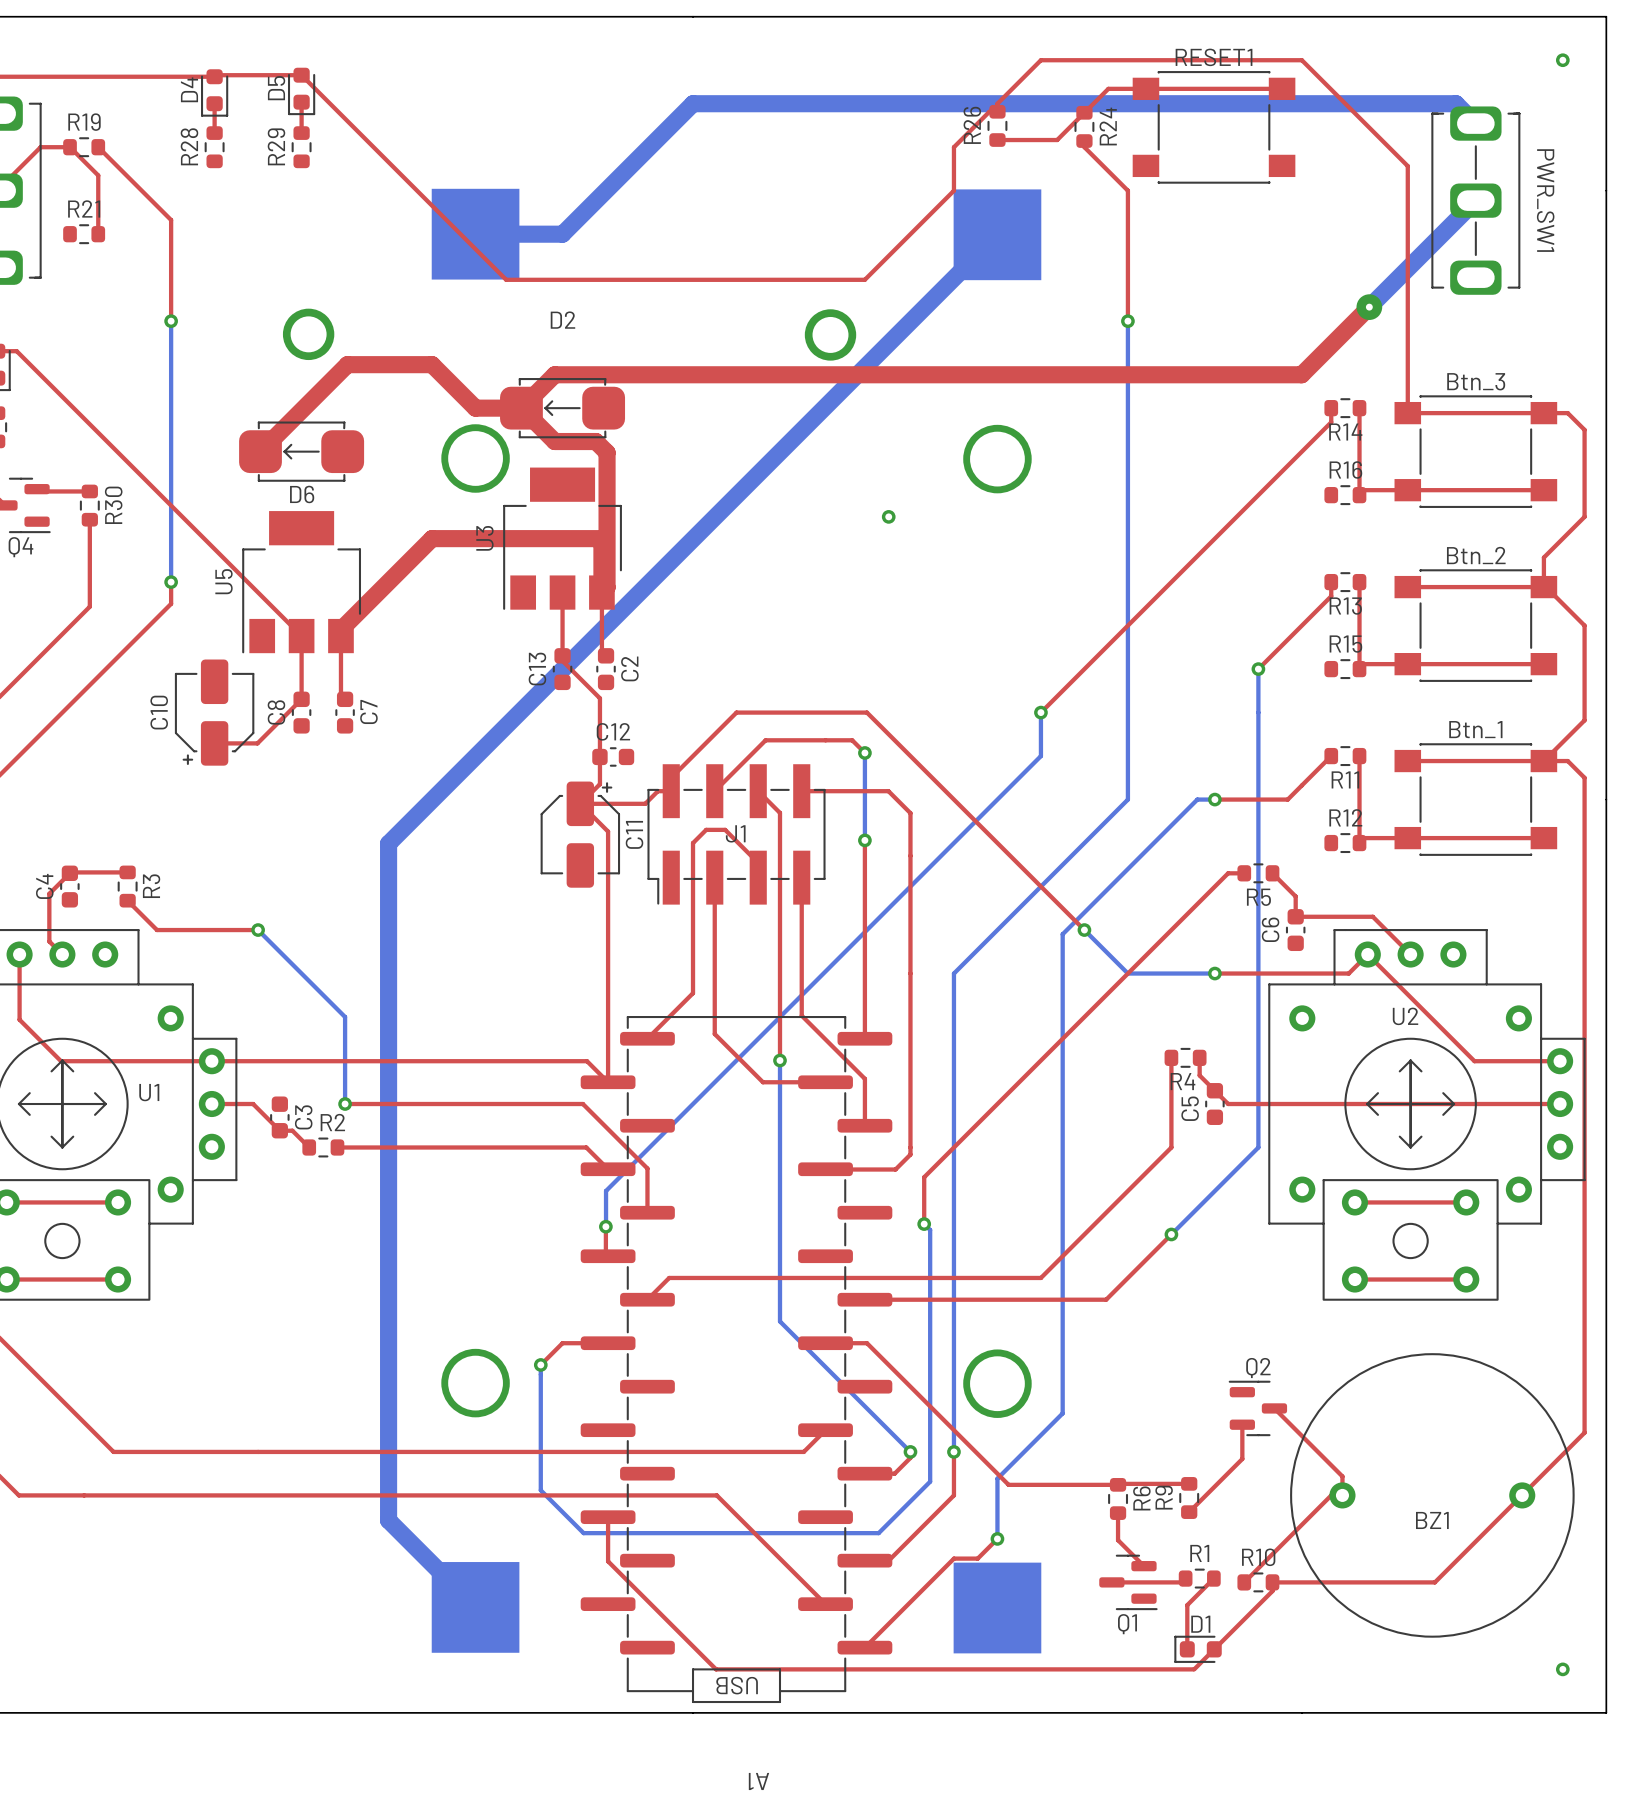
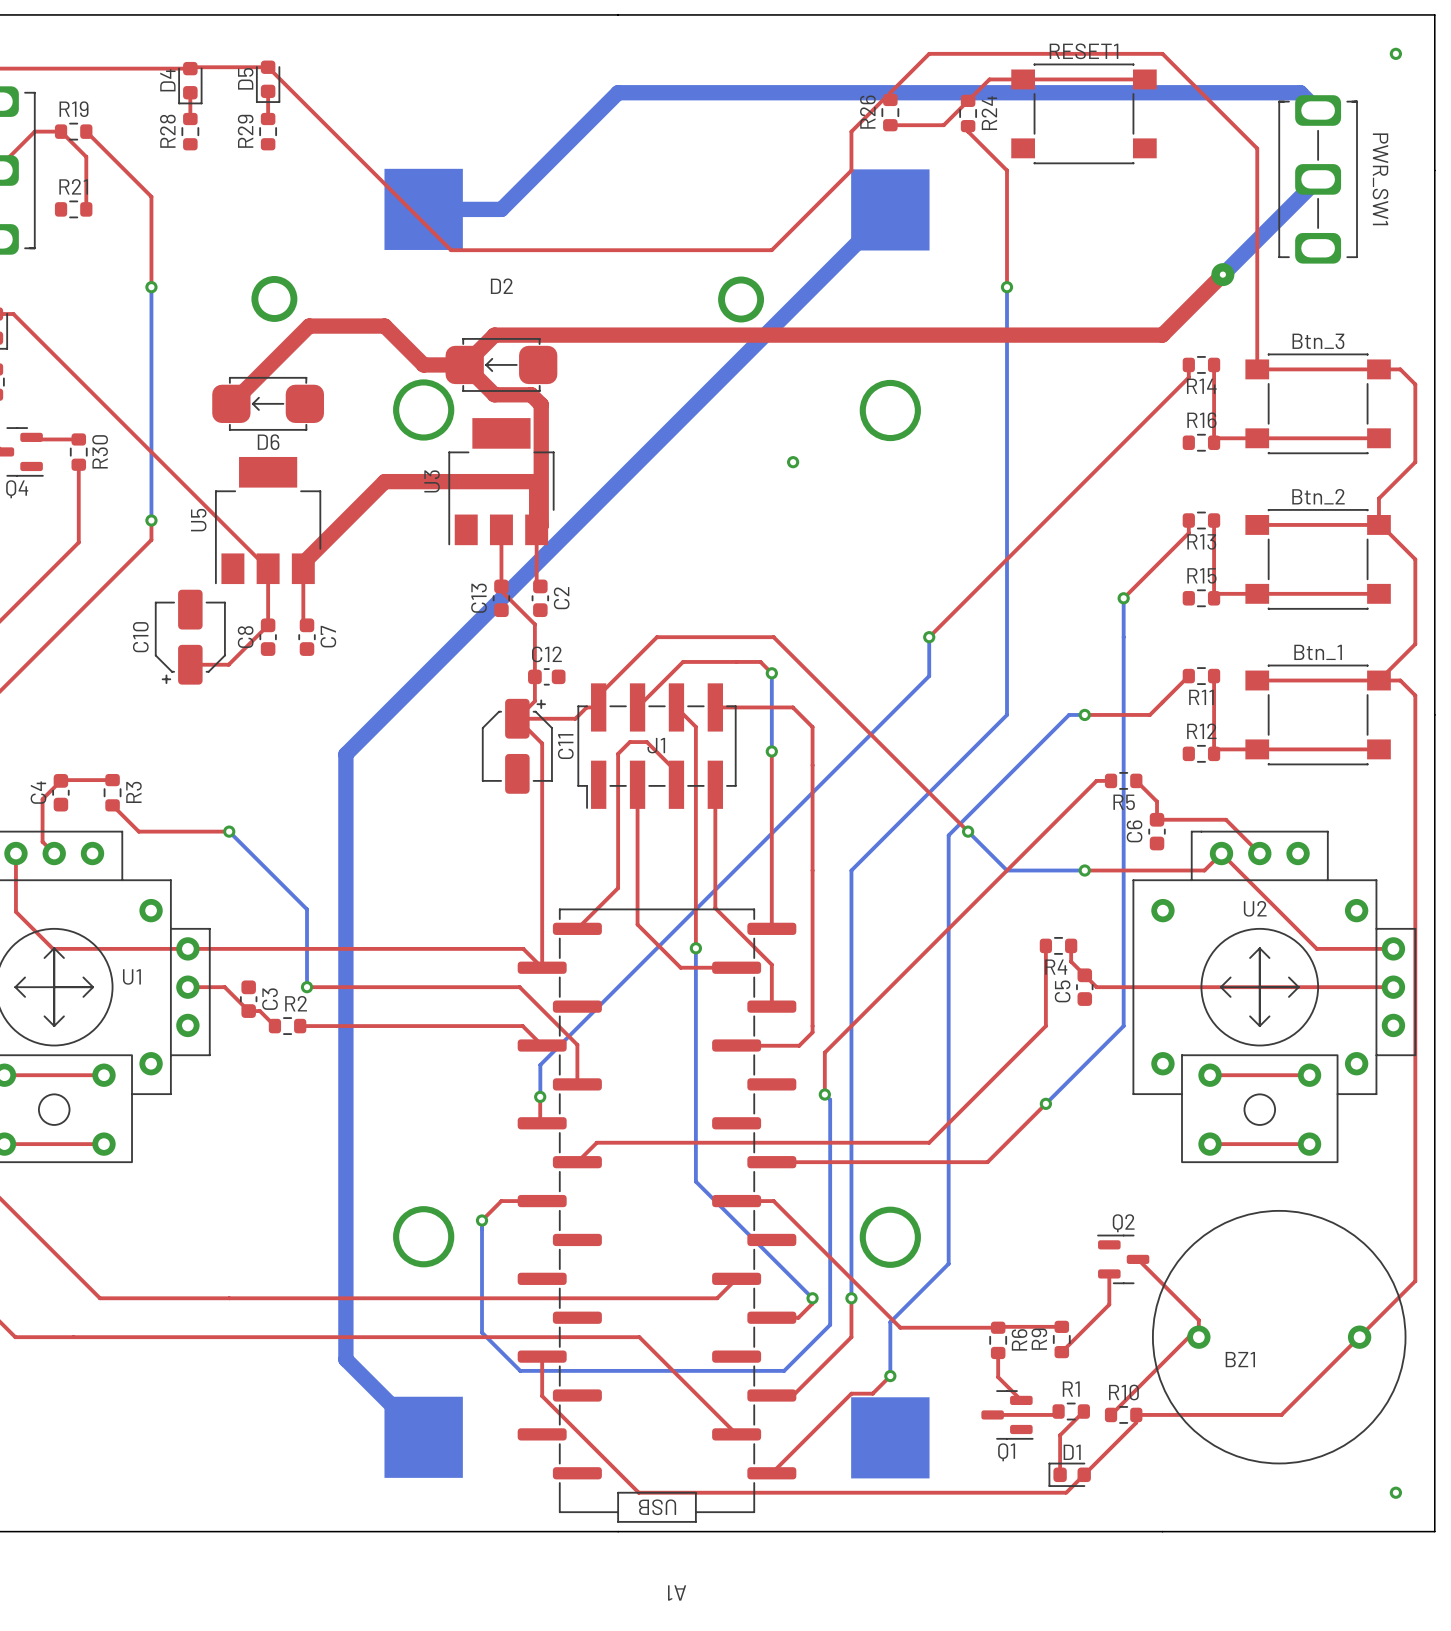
BZ1 name position: BZ1 (1432, 1520) -> BZ1 (1240, 1359)

